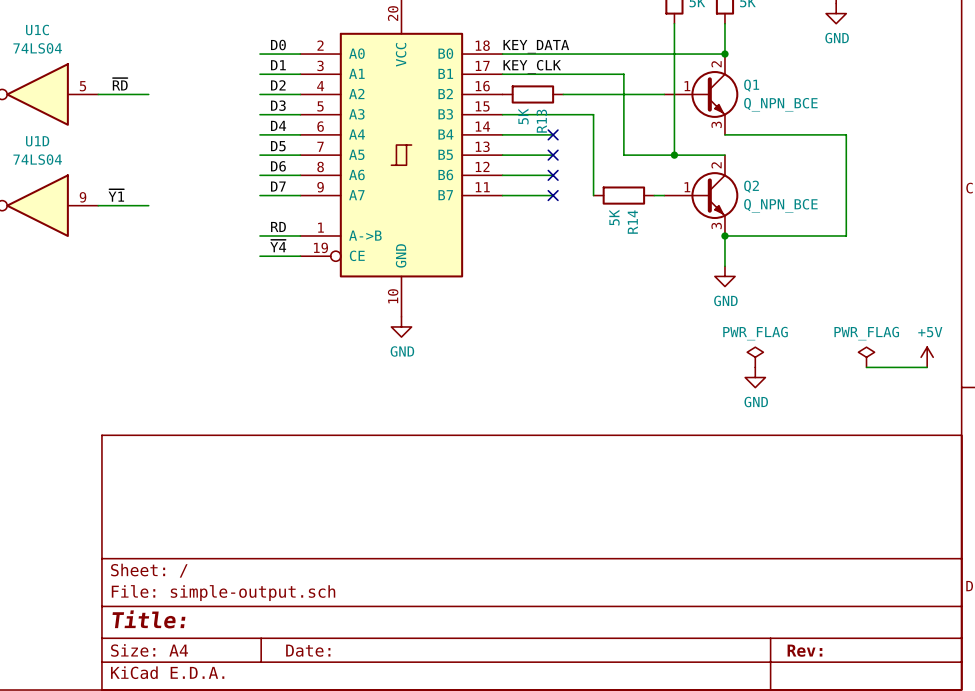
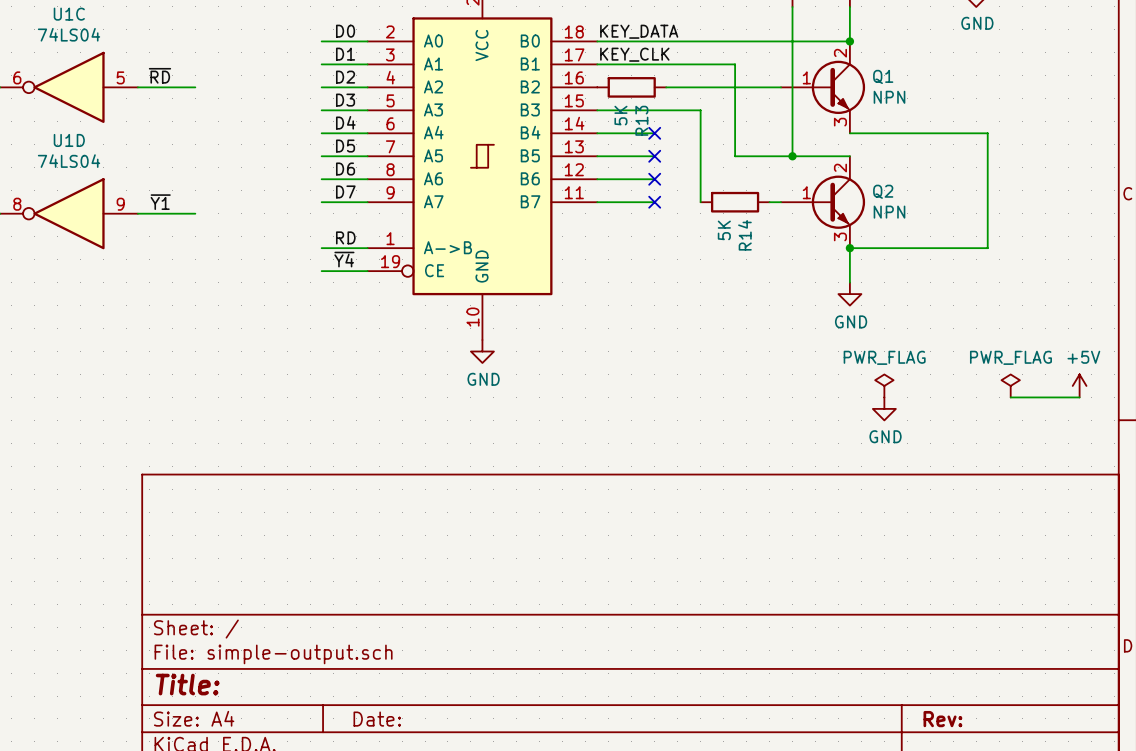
Q1 value: Q_NPN_BCE (780, 104) -> NPN (889, 97)
Q2 value: Q_NPN_BCE (780, 205) -> NPN (889, 212)

